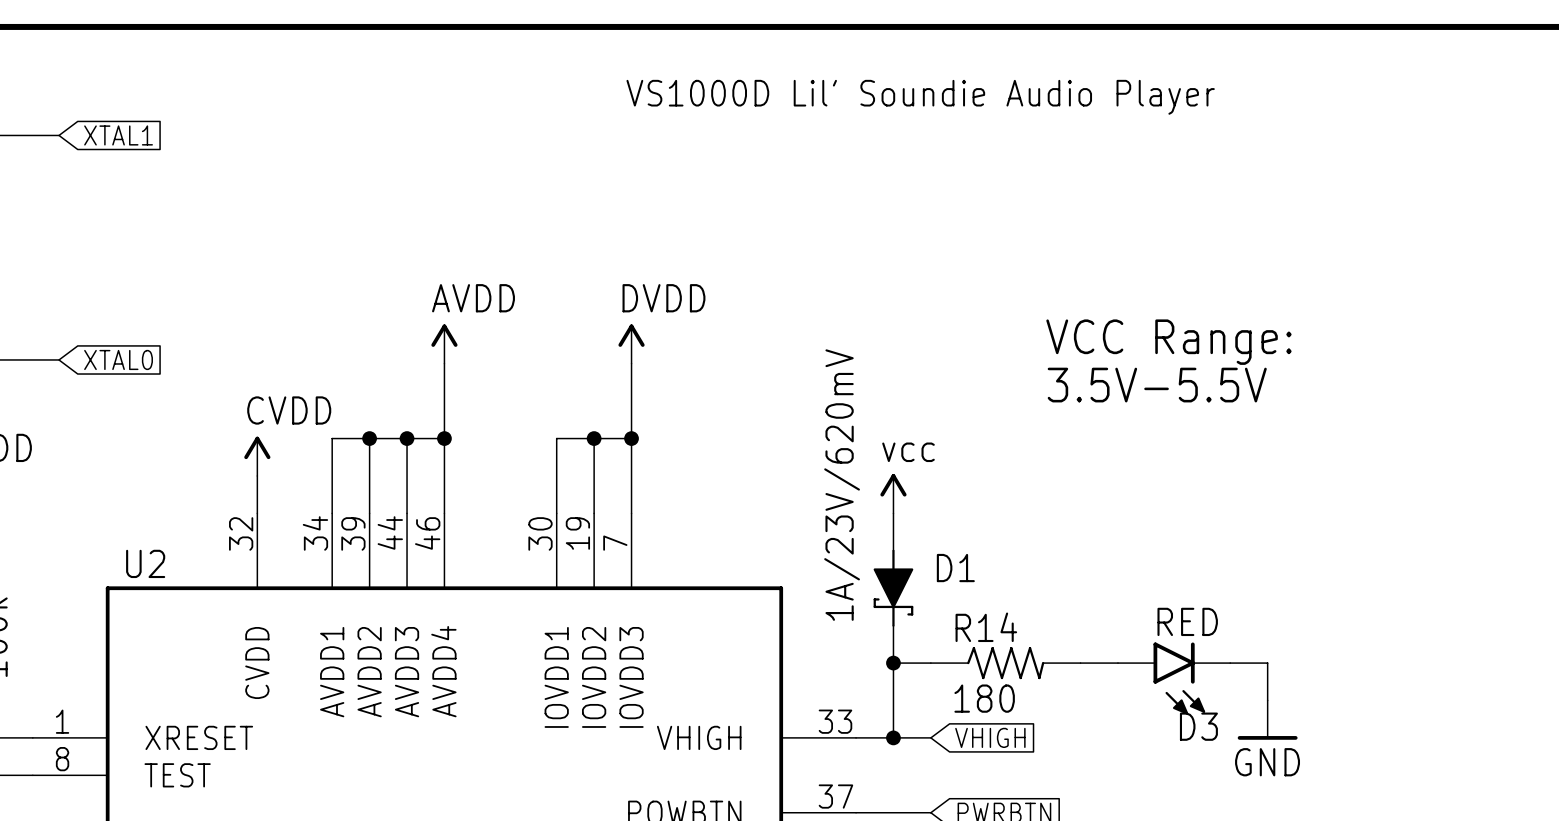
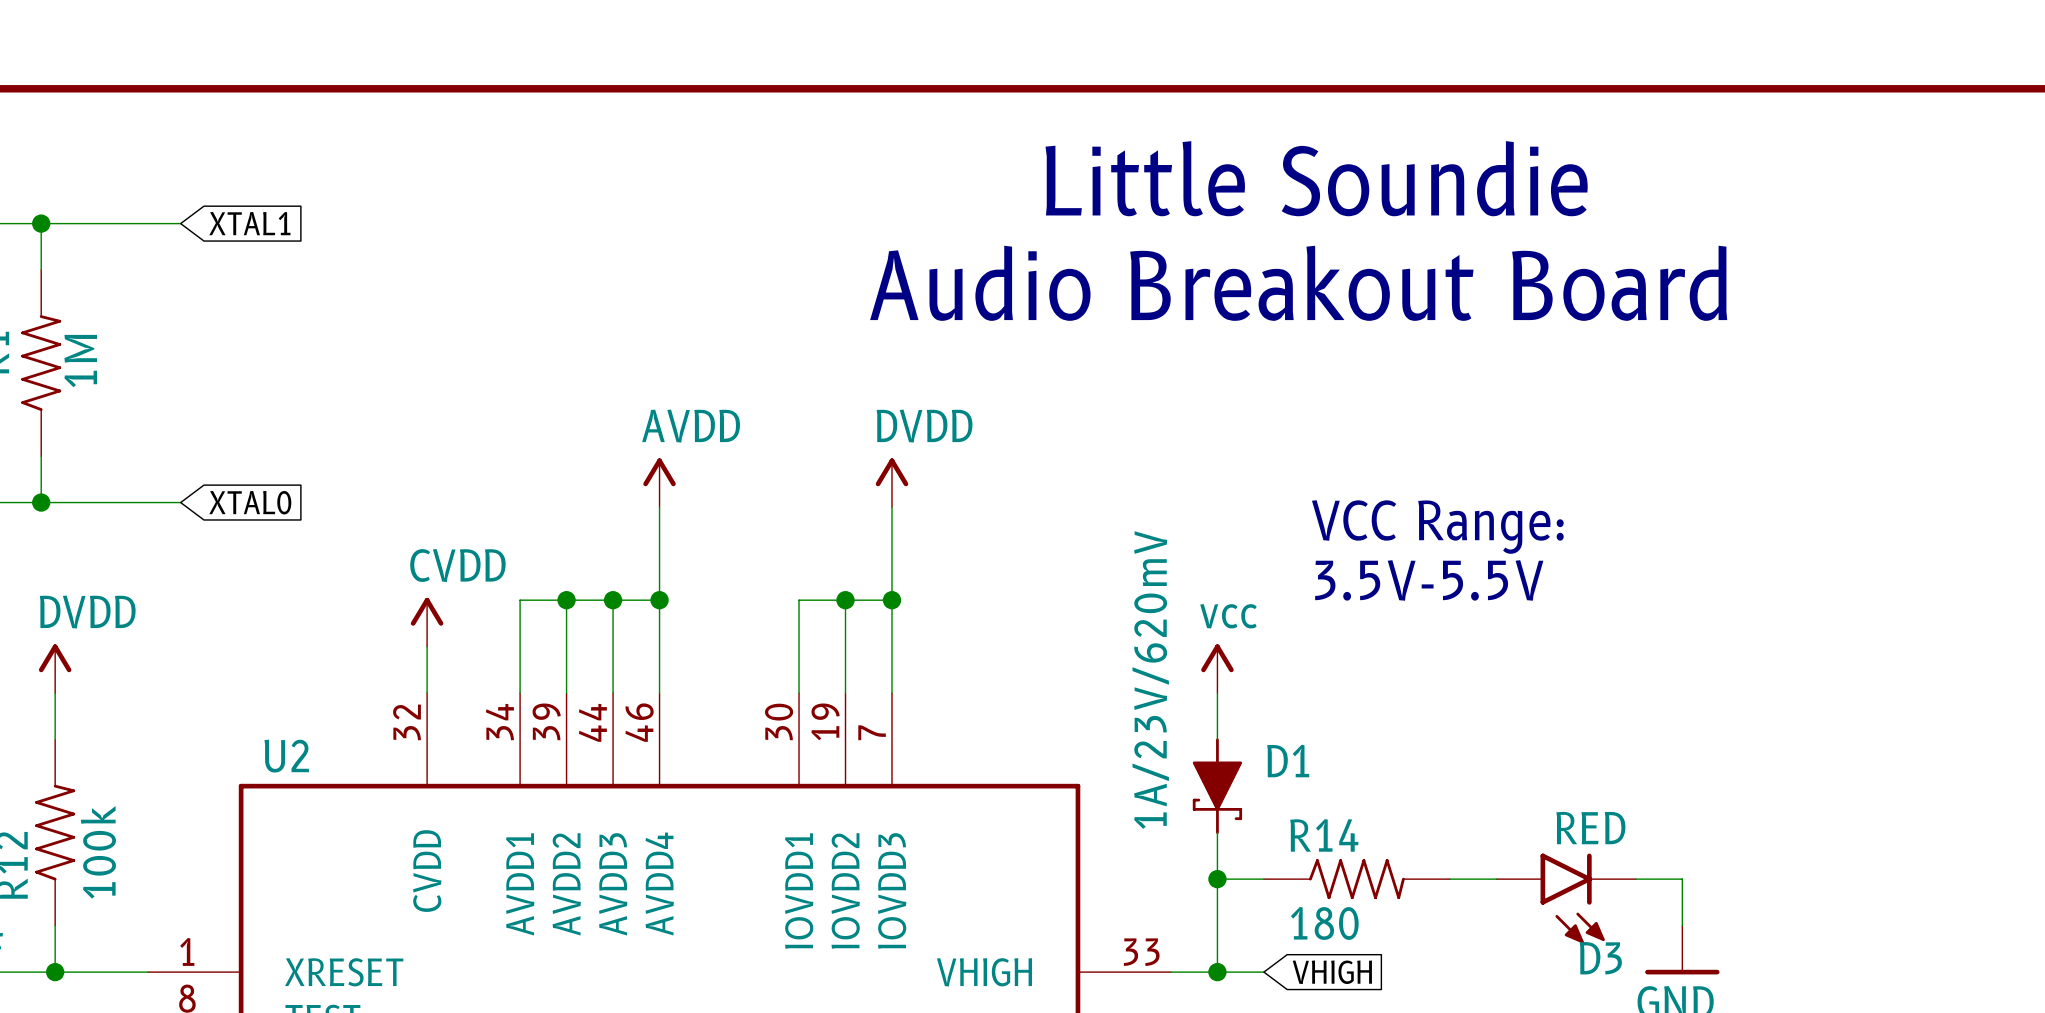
text: VS1000D Lil' Soundie Audio Player (920, 97) -> none
text: none -> Little Soundie (1316, 178)
text: none -> Audio Breakout Board (1298, 283)
text position: VCC Range: (1168, 342) -> VCC Range: (1437, 527)
text position: 3.5V-5.5V (1157, 385) -> 3.5V-5.5V (1429, 580)

